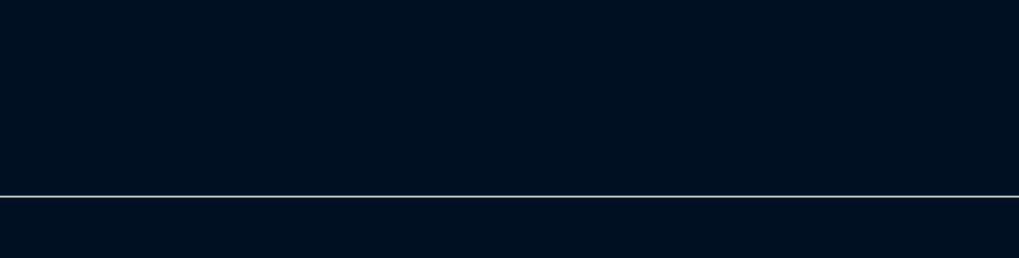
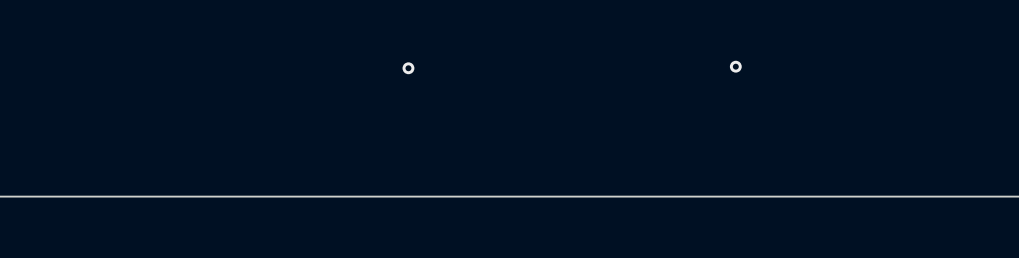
via: none -> (735, 66)
via: none -> (408, 68)

